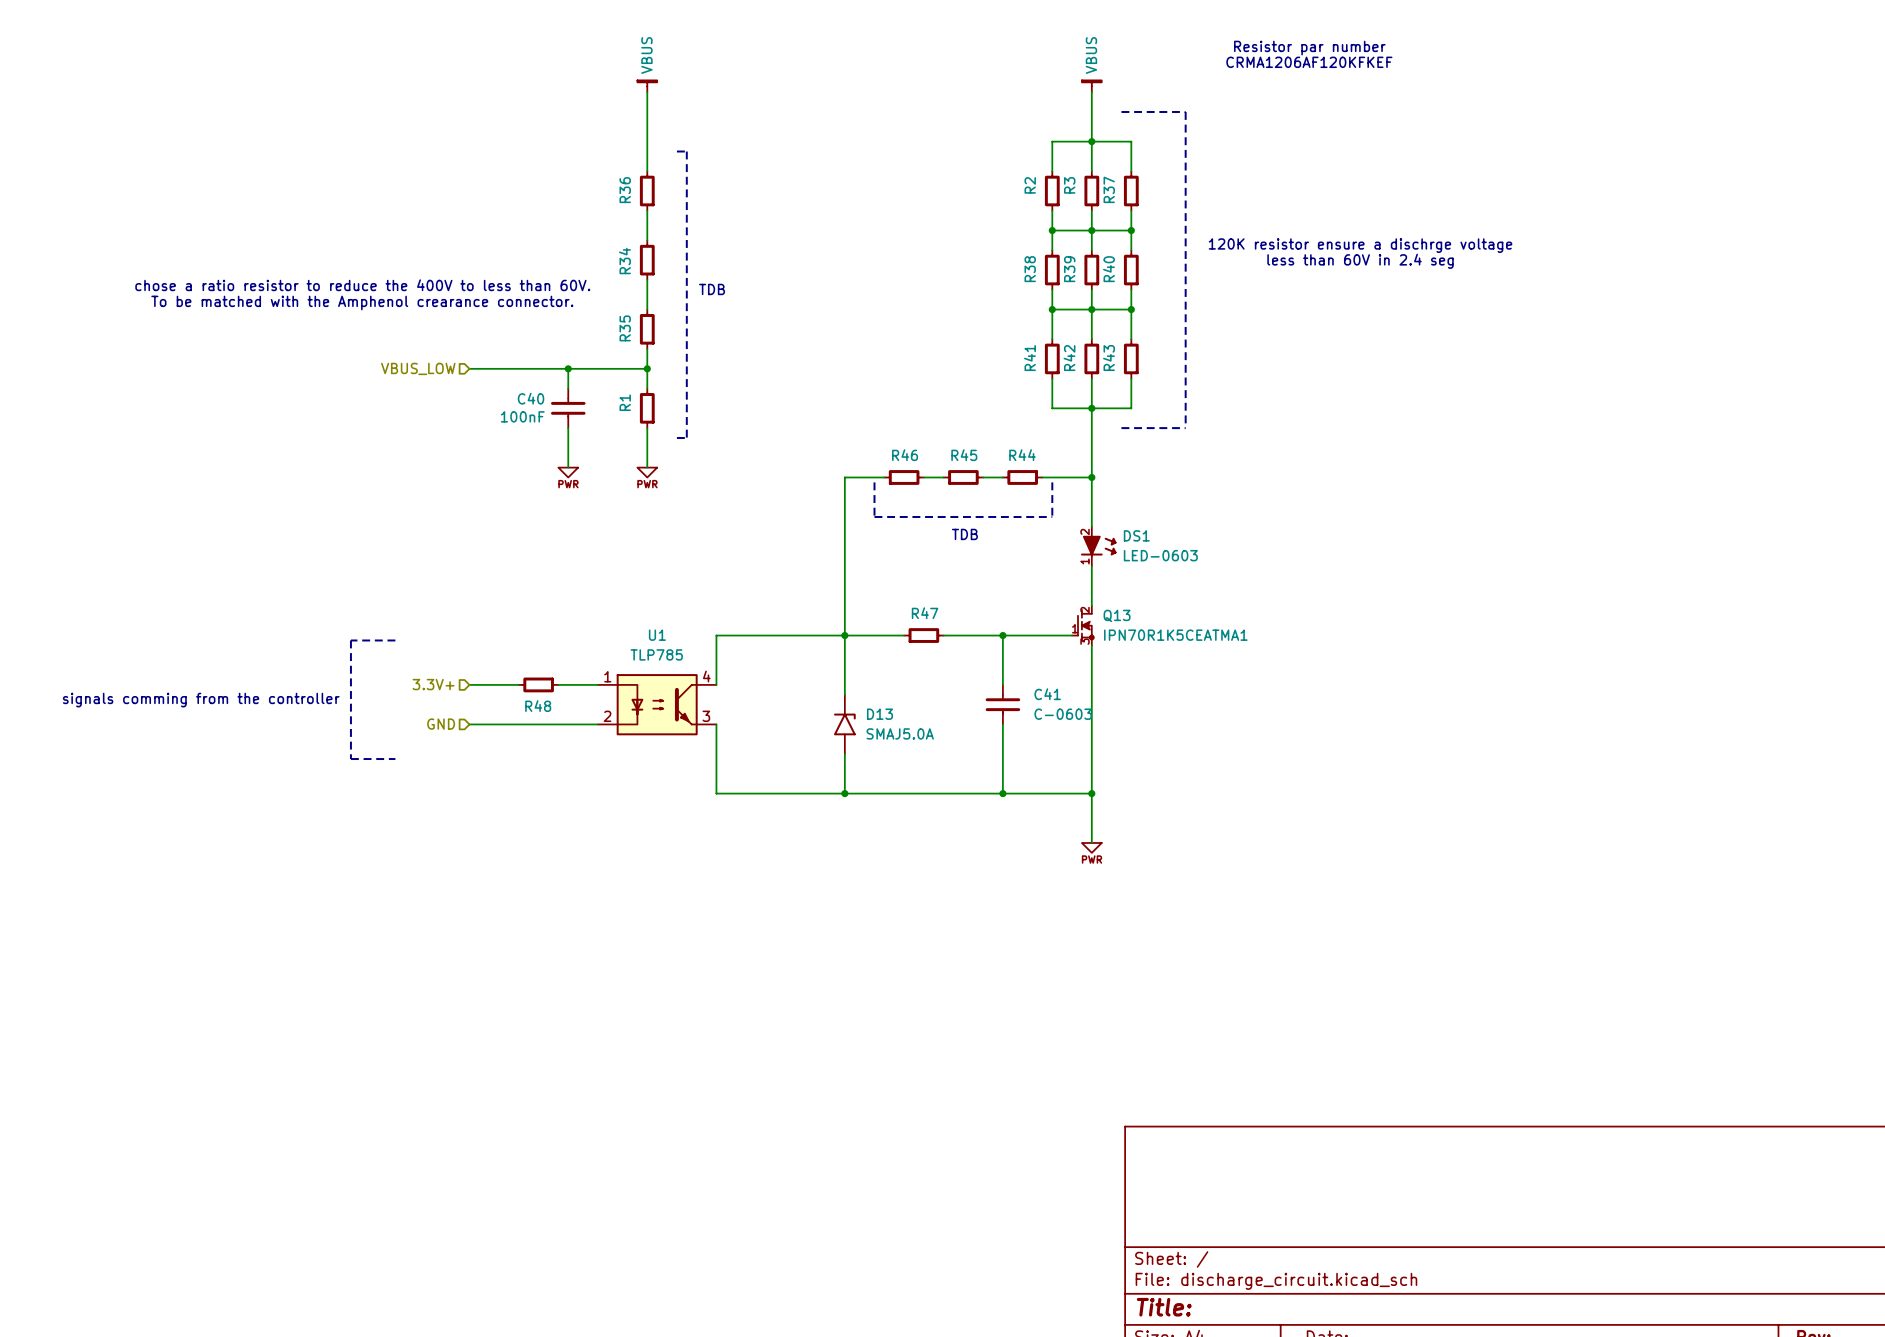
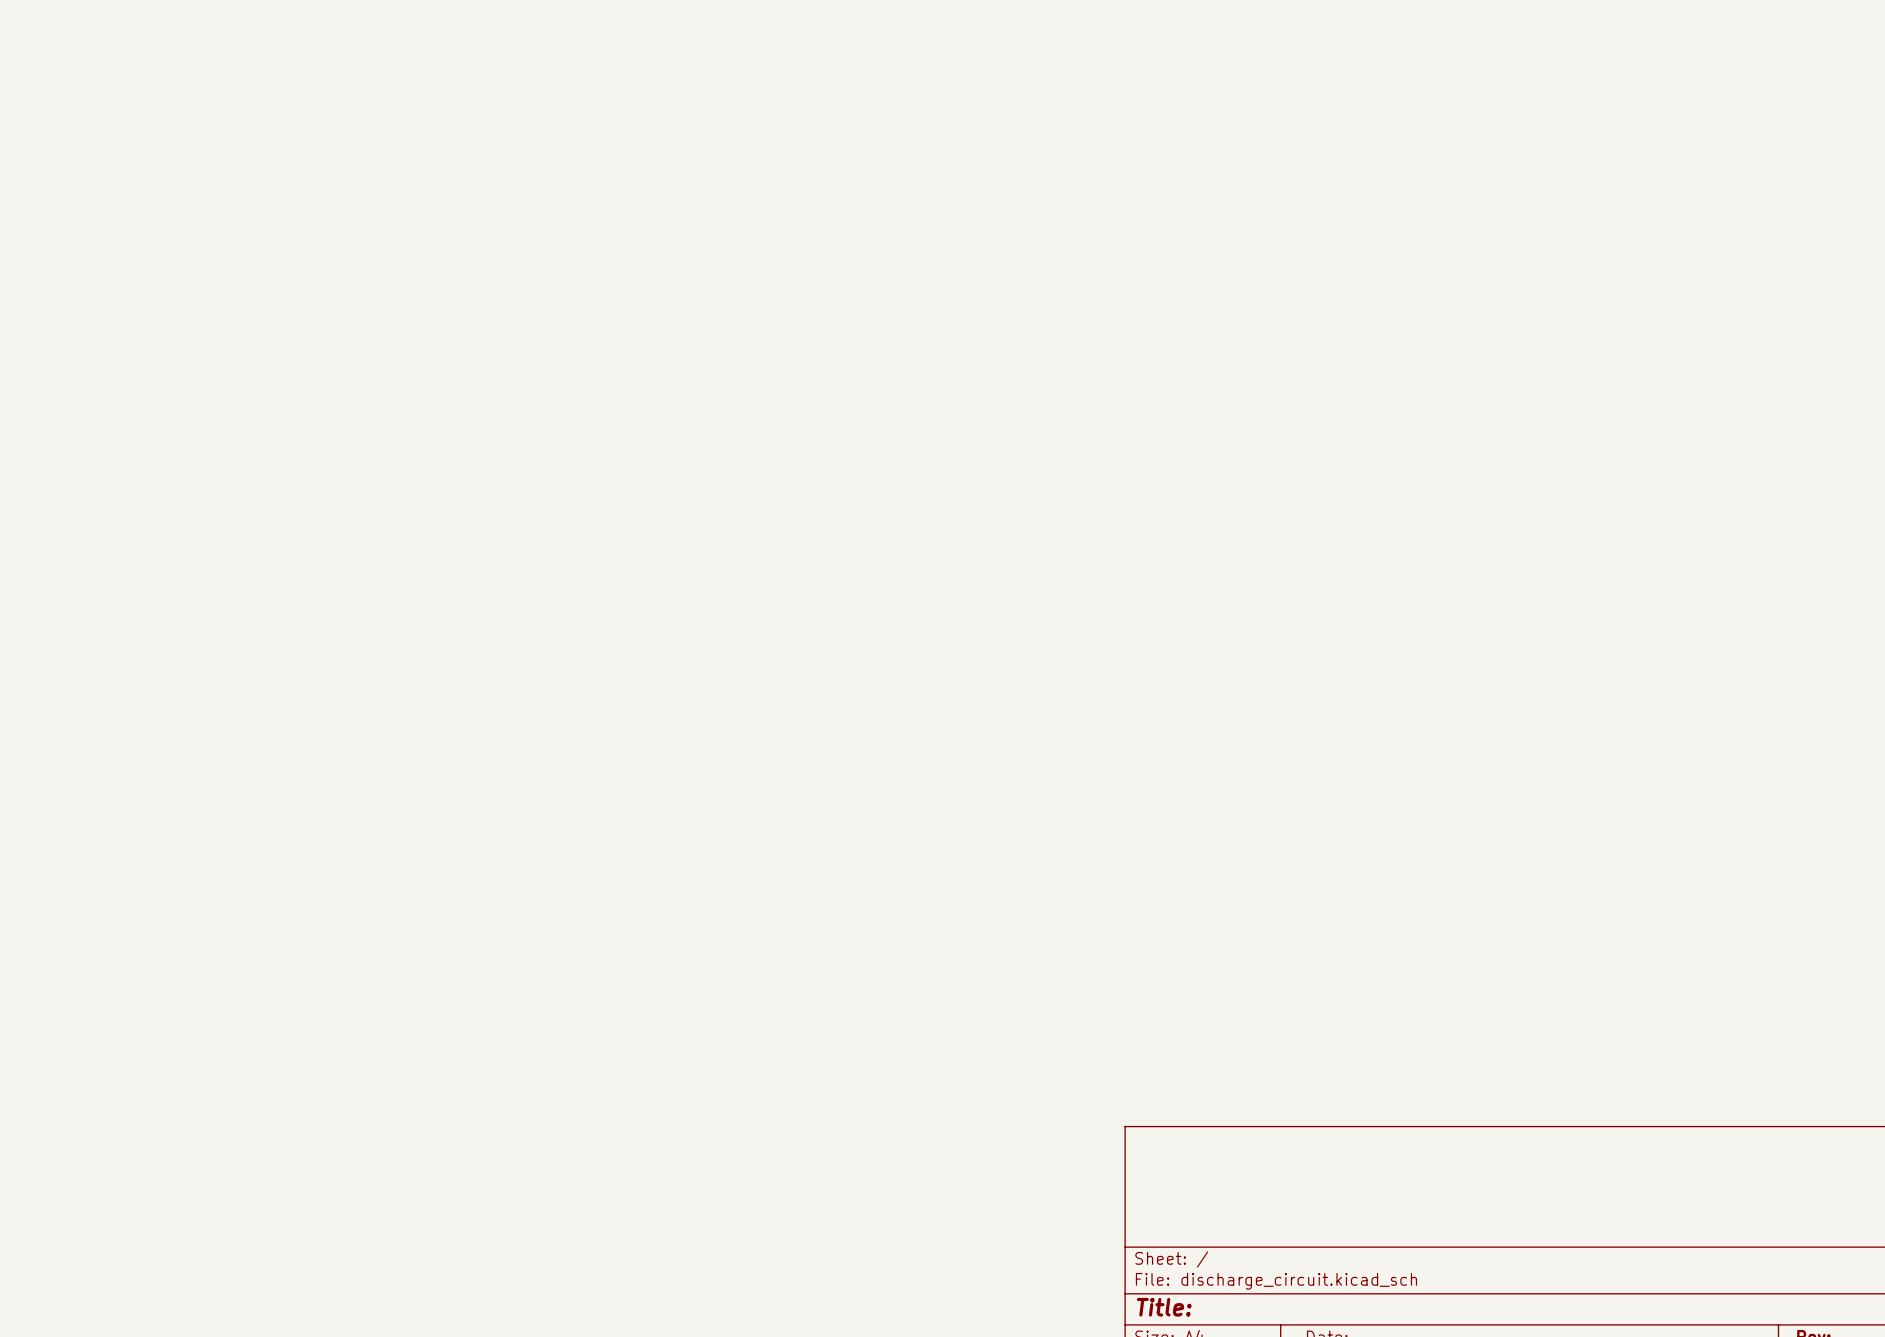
text: Resistor par number (1309, 48) -> none
text: CRMA1206AF120KFKEF (1309, 62) -> none
power symbol: VBUS (647, 86) -> none
power symbol: VBUS (1091, 86) -> none
wire: (647, 92) (647, 171) -> none
wire: (1091, 92) (1091, 171) -> none
line: (1121, 111) (1185, 111) (1185, 428) (1121, 428) -> none
junction: (1091, 141) -> none
line: (676, 151) (686, 151) (686, 437) (676, 437) -> none
wire: (1052, 171) (1052, 141) (1131, 141) (1131, 171) -> none
R36: (647, 191) -> none
R2: (1052, 191) -> none
R3: (1091, 191) -> none
R37: (1131, 191) -> none
wire: (647, 210) (647, 240) -> none
wire: (1052, 210) (1052, 250) -> none
wire: (1091, 210) (1091, 250) -> none
wire: (1131, 210) (1131, 250) -> none
wire: (1052, 230) (1131, 230) -> none
junction: (1052, 230) -> none
junction: (1091, 230) -> none
junction: (1131, 230) -> none
text: 120K resistor ensure a dischrge voltage (1360, 245) -> none
R34: (647, 260) -> none
text: less than 60V in 2.4 seg (1360, 261) -> none
R38: (1052, 270) -> none
R39: (1091, 270) -> none
R40: (1131, 270) -> none
wire: (647, 279) (647, 309) -> none
text: chose a ratio resistor to reduce the 400V to less than 60V. (362, 285) -> none
text: TDB (712, 289) -> none
wire: (1052, 289) (1052, 339) -> none
wire: (1091, 289) (1091, 339) -> none
wire: (1131, 289) (1131, 339) -> none
text: To be matched with the Amphenol crearance connector. (362, 303) -> none
wire: (1052, 309) (1131, 309) -> none
junction: (1052, 309) -> none
junction: (1091, 309) -> none
junction: (1131, 309) -> none
R35: (647, 329) -> none
wire: (647, 349) (647, 388) -> none
R41: (1052, 358) -> none
R42: (1091, 358) -> none
R43: (1131, 358) -> none
hierarchical label: VBUS_LOW (418, 368) -> none
wire: (469, 368) (647, 368) -> none
wire: (568, 368) (568, 388) -> none
junction: (568, 368) -> none
junction: (647, 368) -> none
wire: (1052, 378) (1052, 408) (1131, 408) (1131, 378) -> none
wire: (1091, 378) (1091, 526) -> none
C40: 100nF (568, 408) -> none
R1: (647, 408) -> none
junction: (1091, 408) -> none
wire: (568, 428) (568, 467) -> none
wire: (647, 428) (647, 467) -> none
power symbol: (568, 472) -> none
power symbol: (647, 472) -> none
wire: (884, 477) (844, 477) (844, 694) -> none
R46: (904, 477) -> none
wire: (923, 477) (943, 477) -> none
R45: (963, 477) -> none
wire: (983, 477) (1002, 477) -> none
R44: (1022, 477) -> none
wire: (1042, 477) (1091, 477) -> none
junction: (1091, 477) -> none
line: (874, 482) (874, 517) (1052, 517) (1052, 482) -> none
text: TDB (964, 534) -> none
DS1: LED-0603 (1098, 546) -> none
wire: (1091, 566) (1091, 605) -> none
Q13: IPN70R1K5CEATMA1 (1082, 625) -> none
junction: (844, 635) -> none
wire: (904, 635) (716, 635) (716, 684) -> none
R47: (923, 635) -> none
wire: (943, 635) (1072, 635) -> none
wire: (1002, 635) (1002, 684) -> none
junction: (1002, 635) -> none
line: (395, 640) (350, 640) (350, 759) (395, 759) -> none
wire: (1091, 645) (1091, 842) -> none
hierarchical label: 3.3V+ (433, 684) -> none
wire: (469, 684) (518, 684) -> none
R48: (538, 684) -> none
wire: (558, 684) (597, 684) -> none
text: signals comming from the controller (201, 700) -> none
U1: TLP785 (657, 704) -> none
C41: C-0603 (1002, 704) -> none
hierarchical label: GND (441, 724) -> none
wire: (469, 724) (597, 724) -> none
wire: (716, 724) (716, 793) (1091, 793) -> none
D13: SMAJ5.0A (844, 724) -> none
wire: (1002, 724) (1002, 793) -> none
wire: (844, 754) (844, 793) -> none
junction: (844, 793) -> none
junction: (1002, 793) -> none
junction: (1091, 793) -> none
power symbol: (1091, 847) -> none

